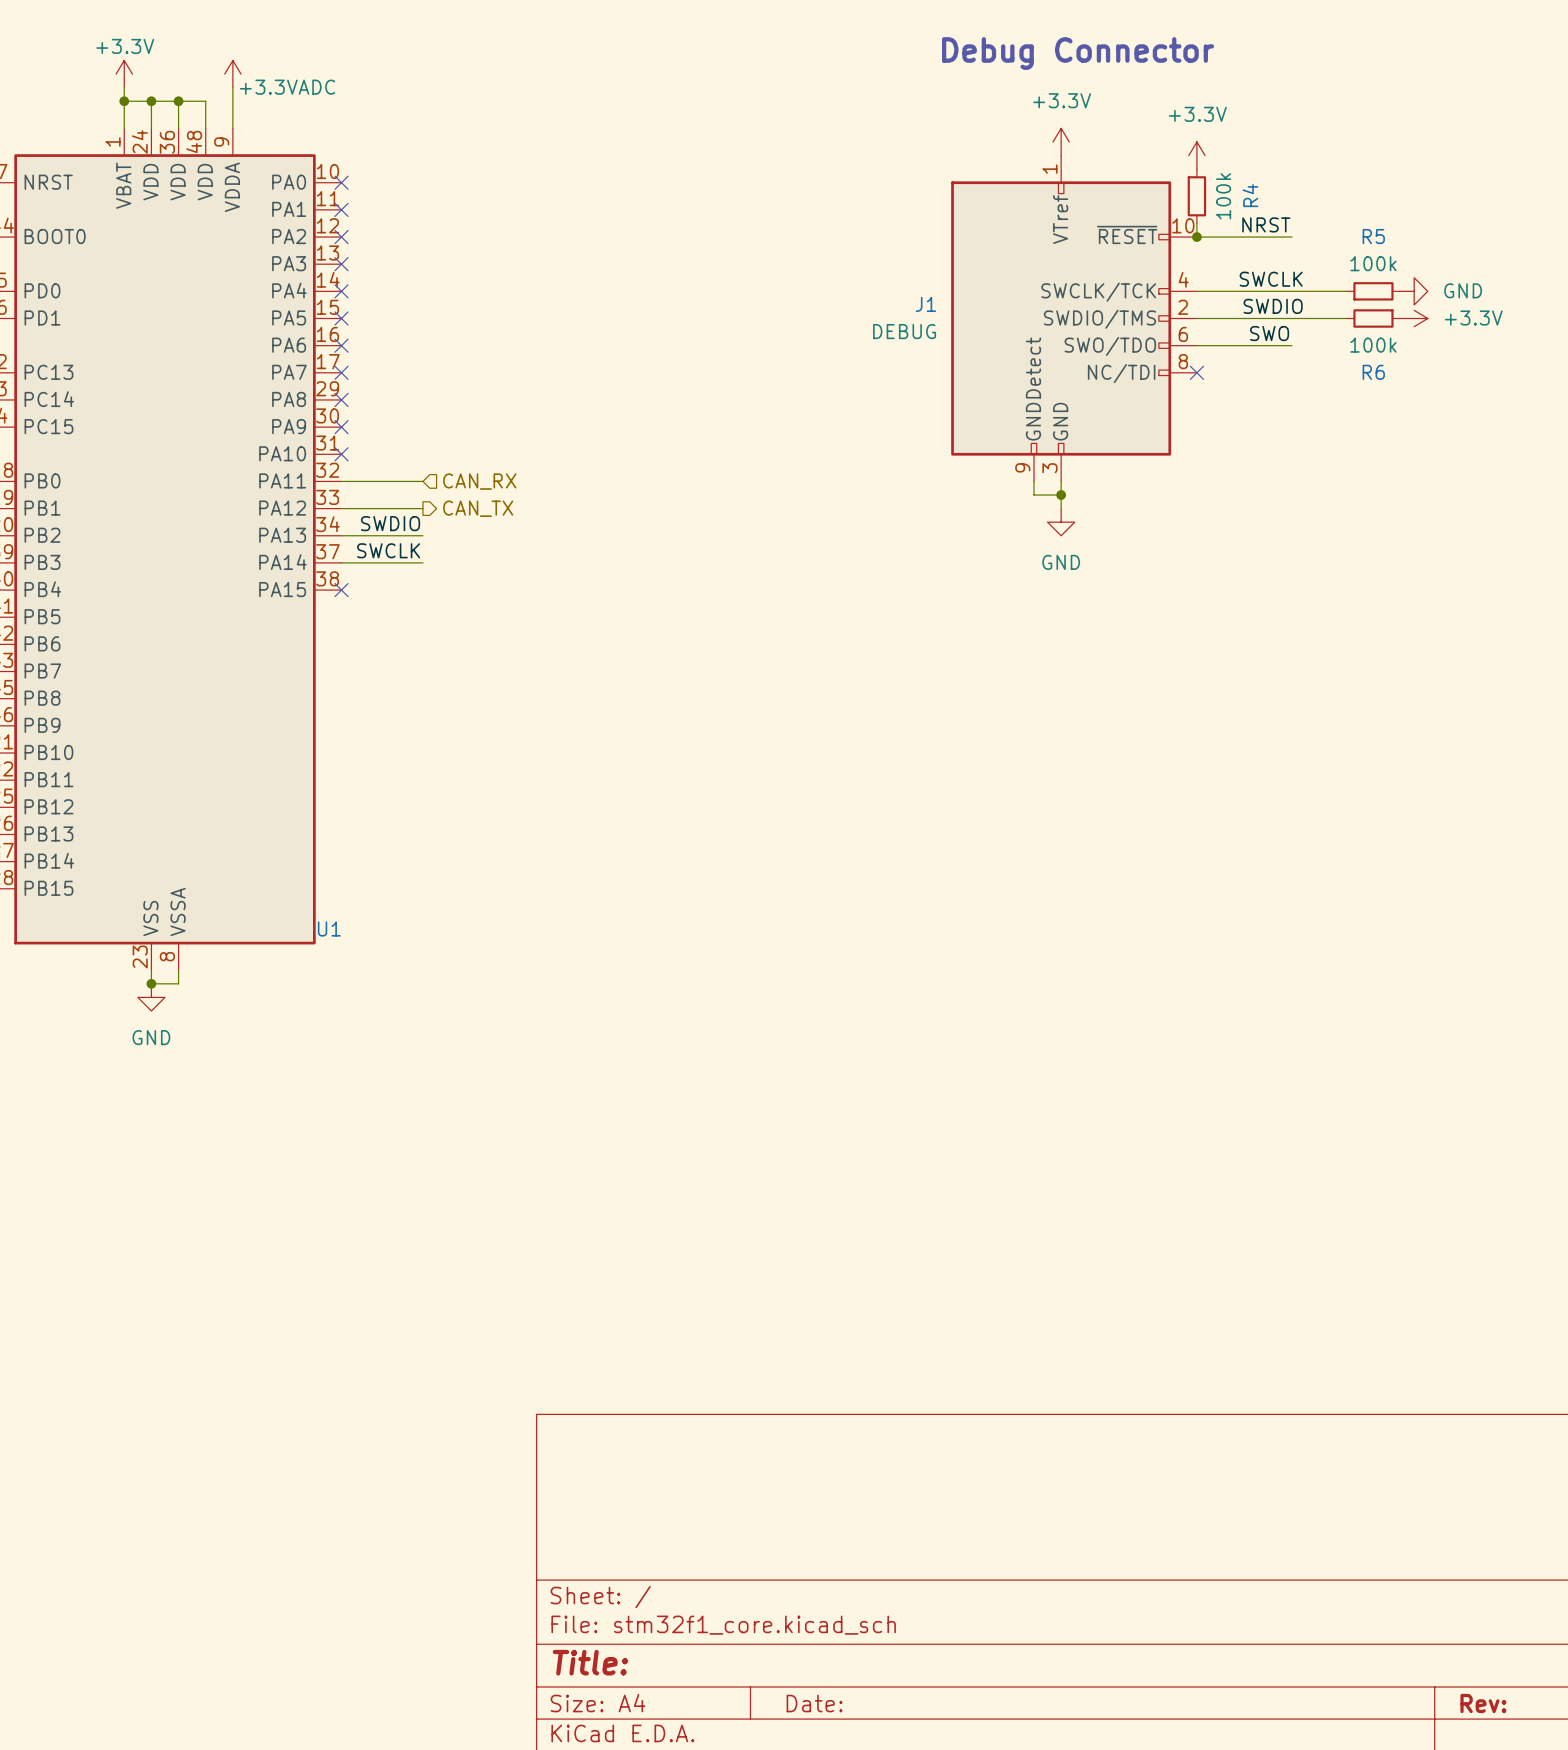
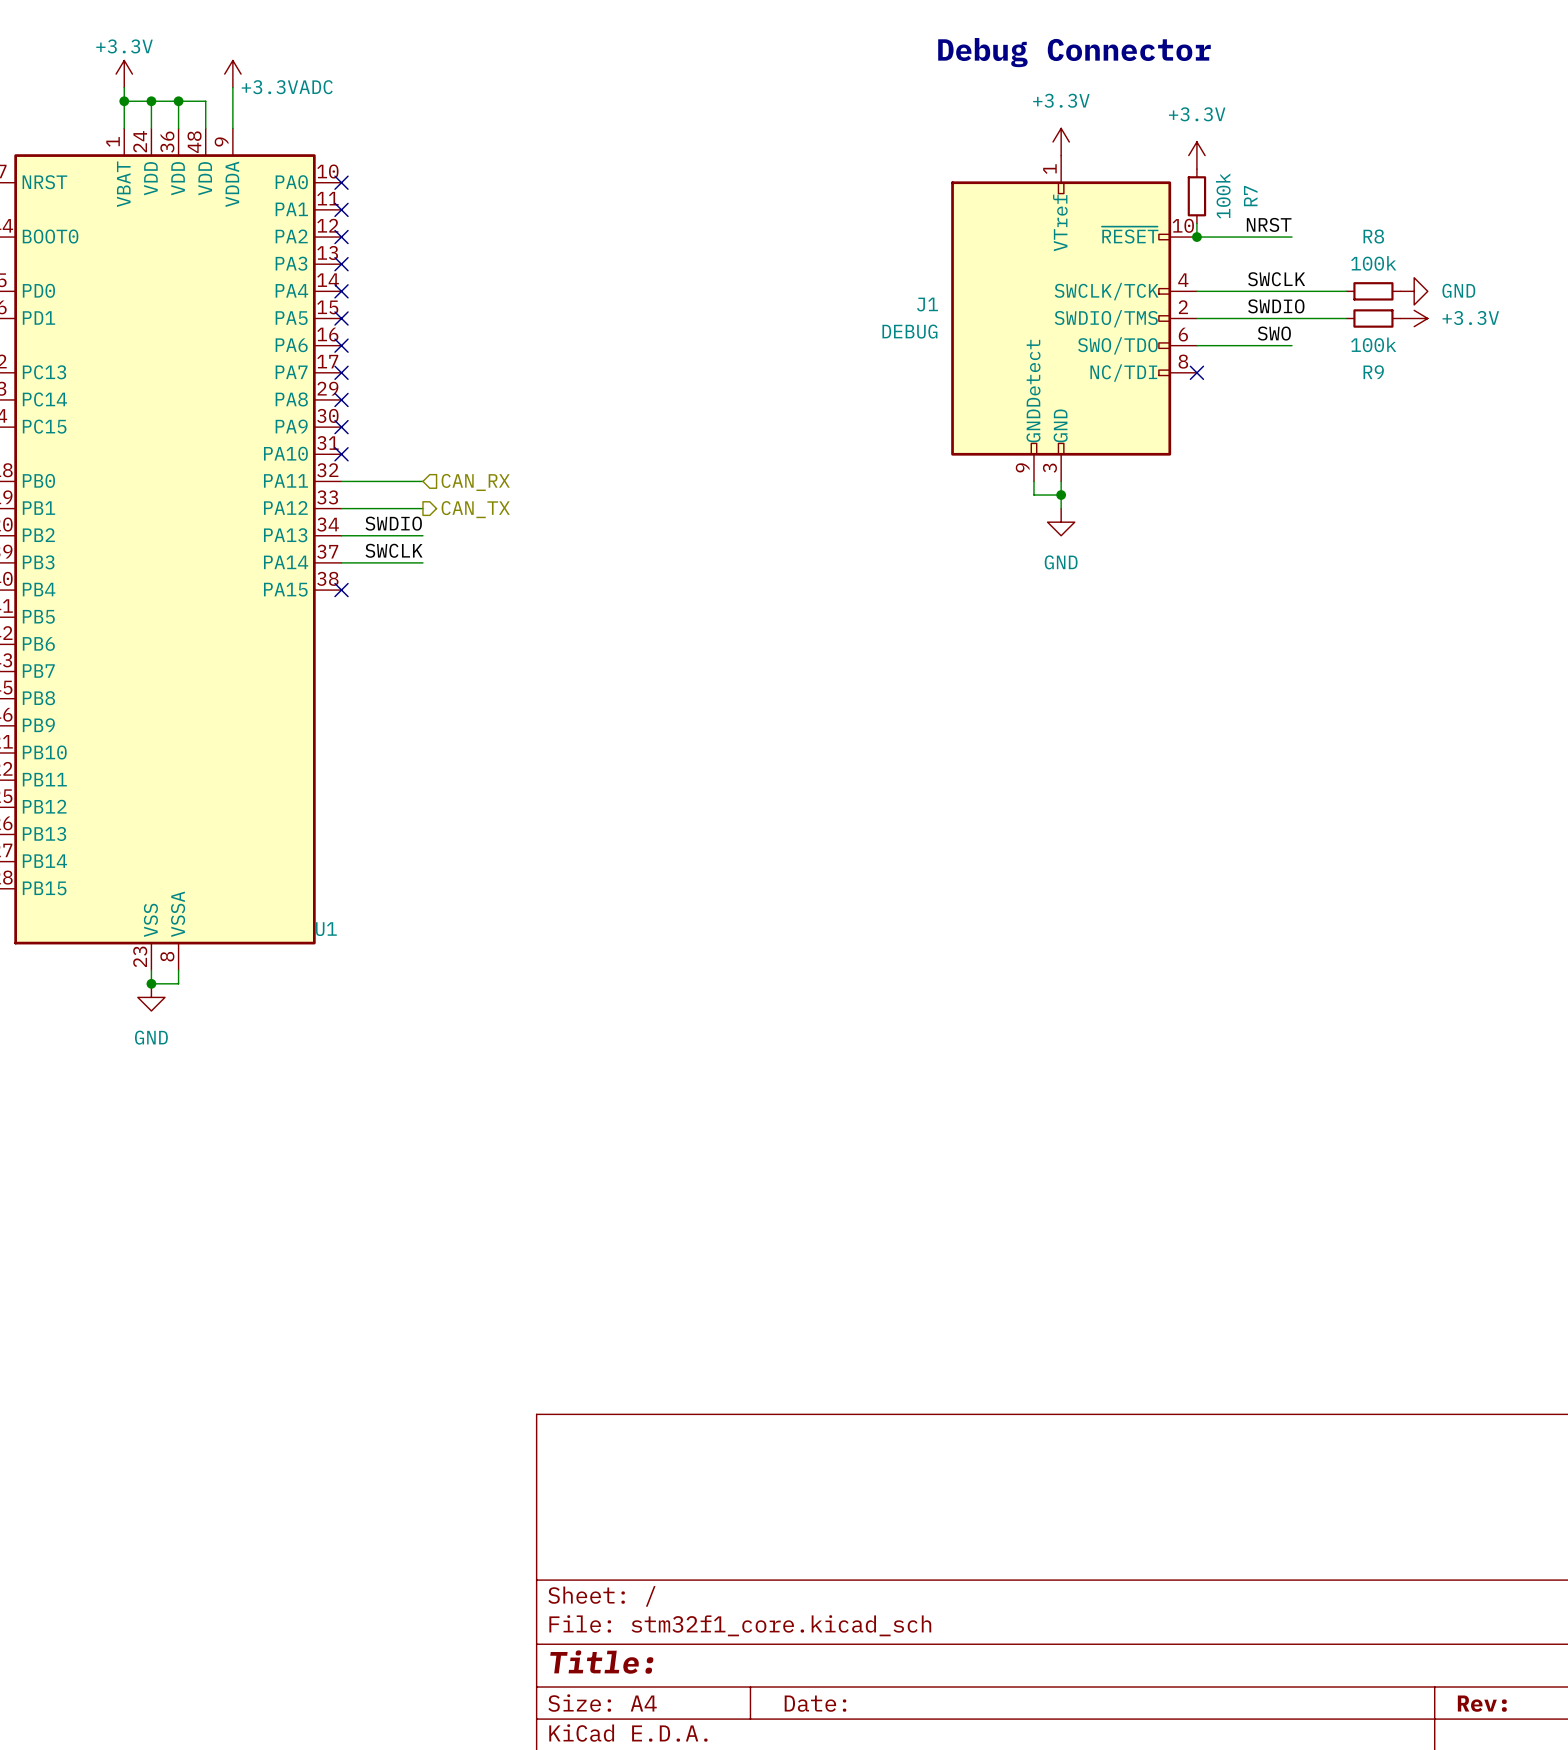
R4 name: R4 (1250, 195) -> R7 (1250, 196)
R5 name: R5 (1373, 236) -> R8 (1373, 236)
R6 name: R6 (1373, 372) -> R9 (1373, 372)

